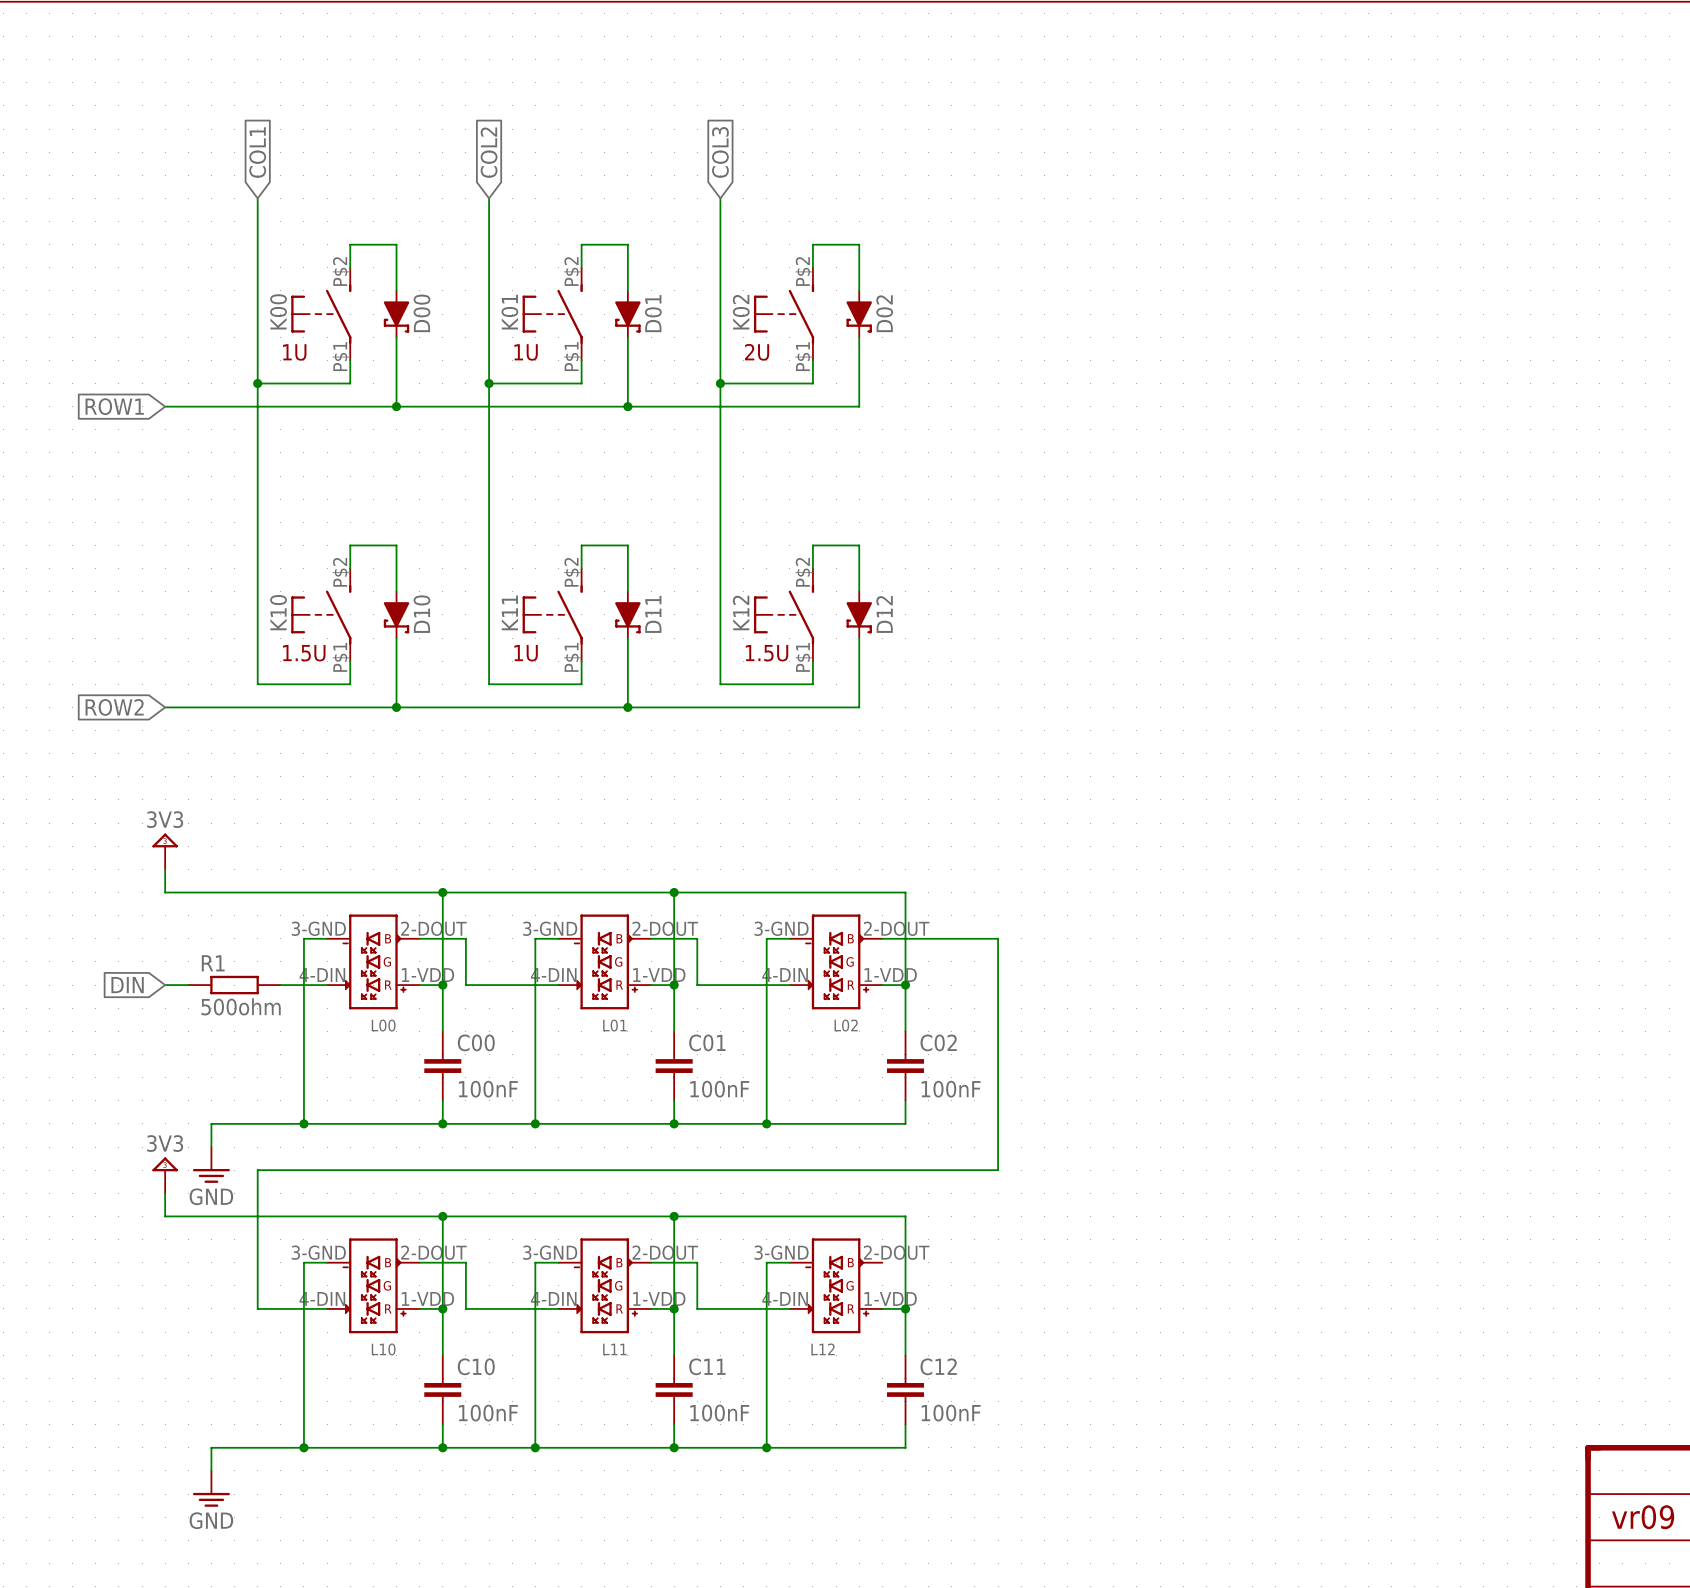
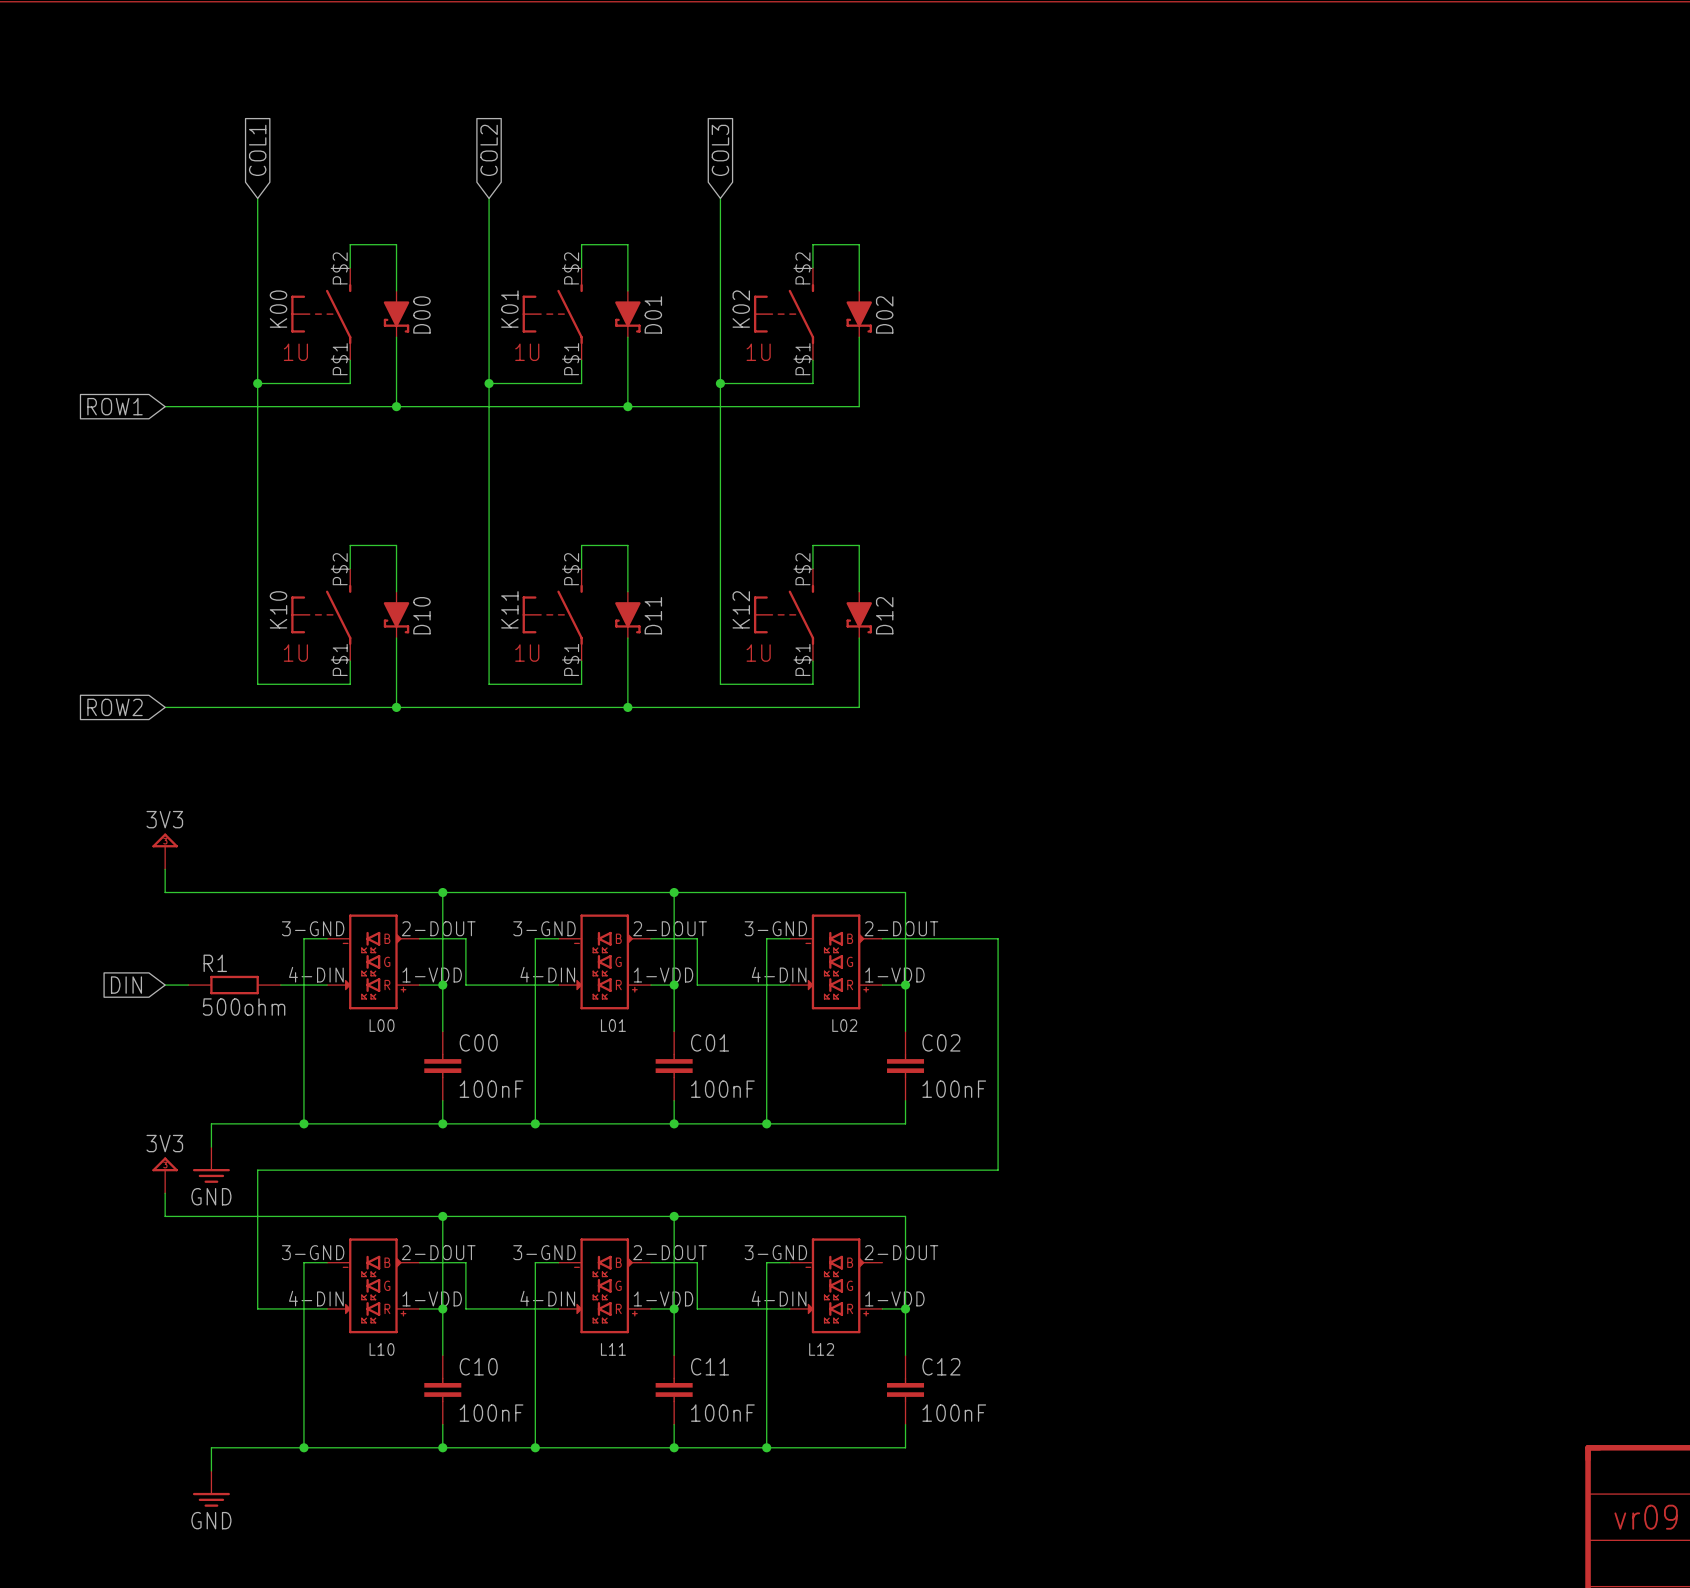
part text: 2U (757, 352) -> 1U (758, 352)
part: none -> (295, 653)
part: (304, 653) -> none
part: none -> (758, 653)
part: (767, 653) -> none

